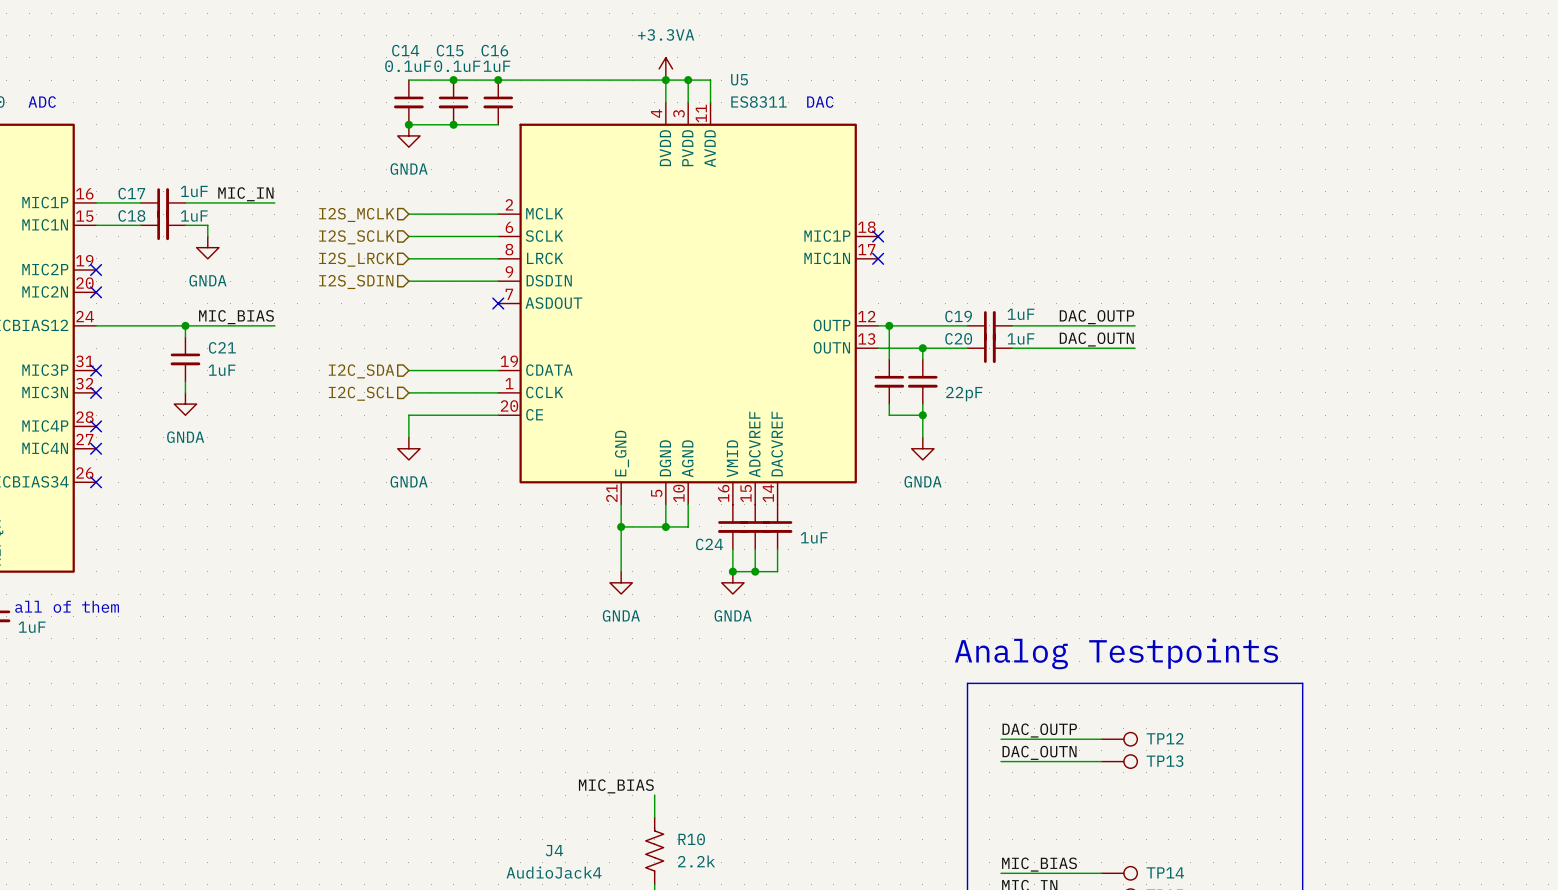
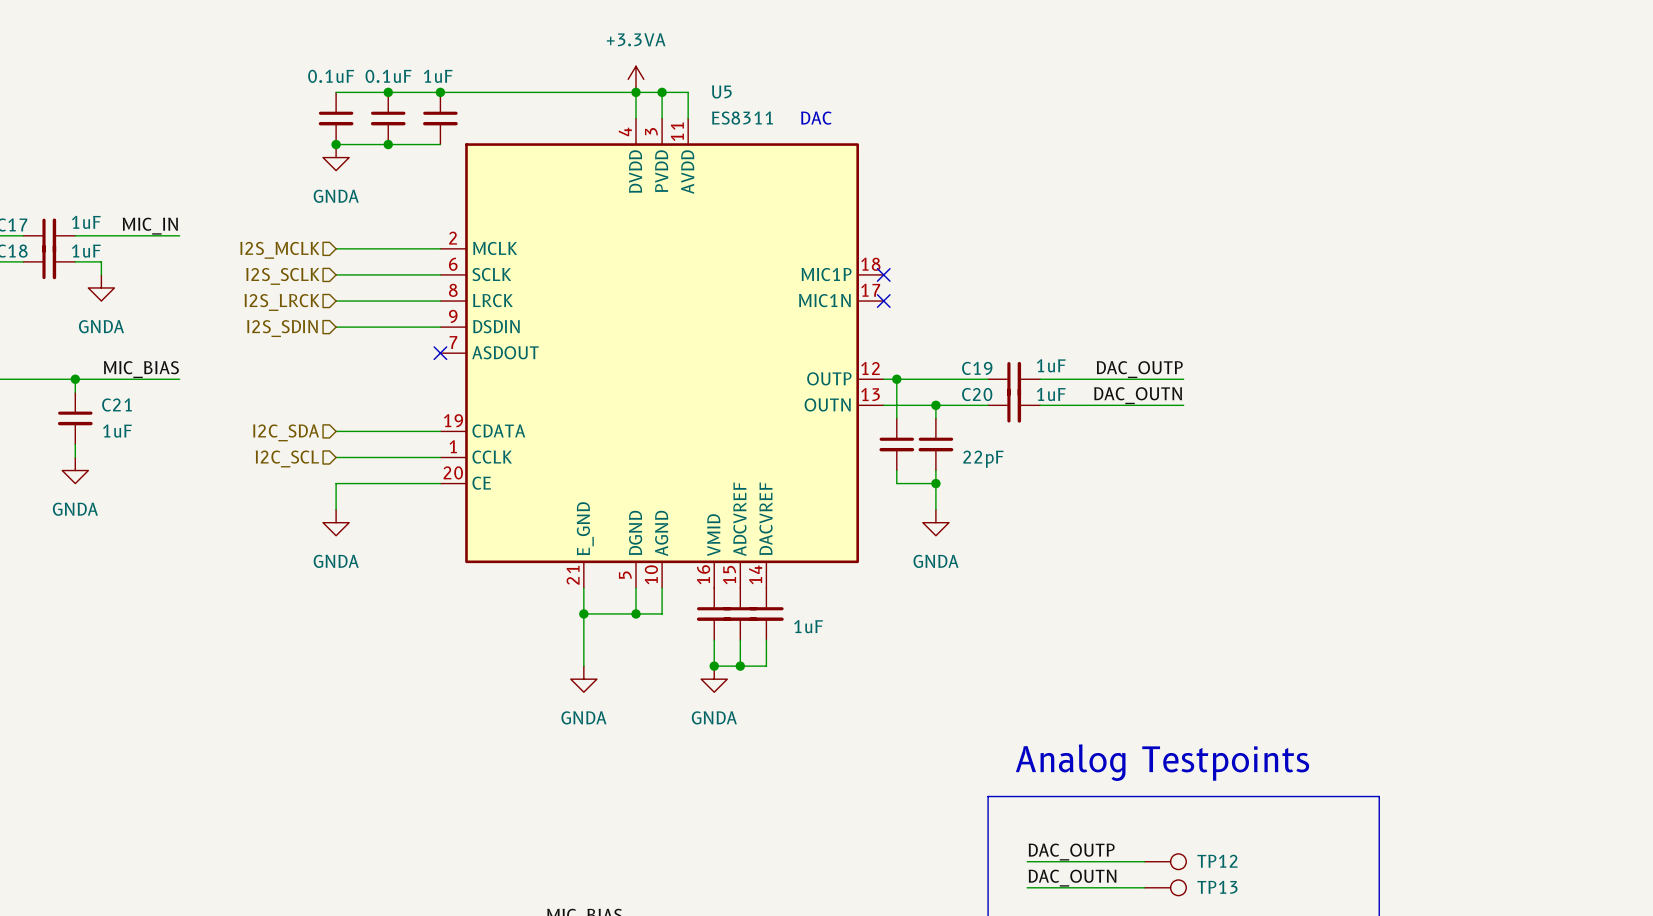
C14 name: C14 (405, 50) -> none
C15 name: C15 (450, 50) -> none
C16 name: C16 (494, 50) -> none
C24 name: C24 (709, 544) -> none

